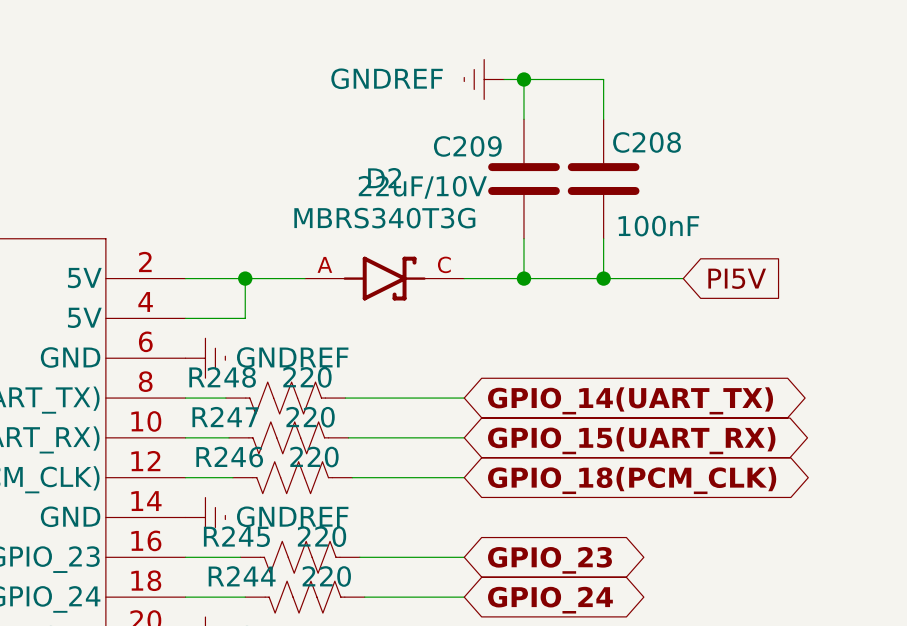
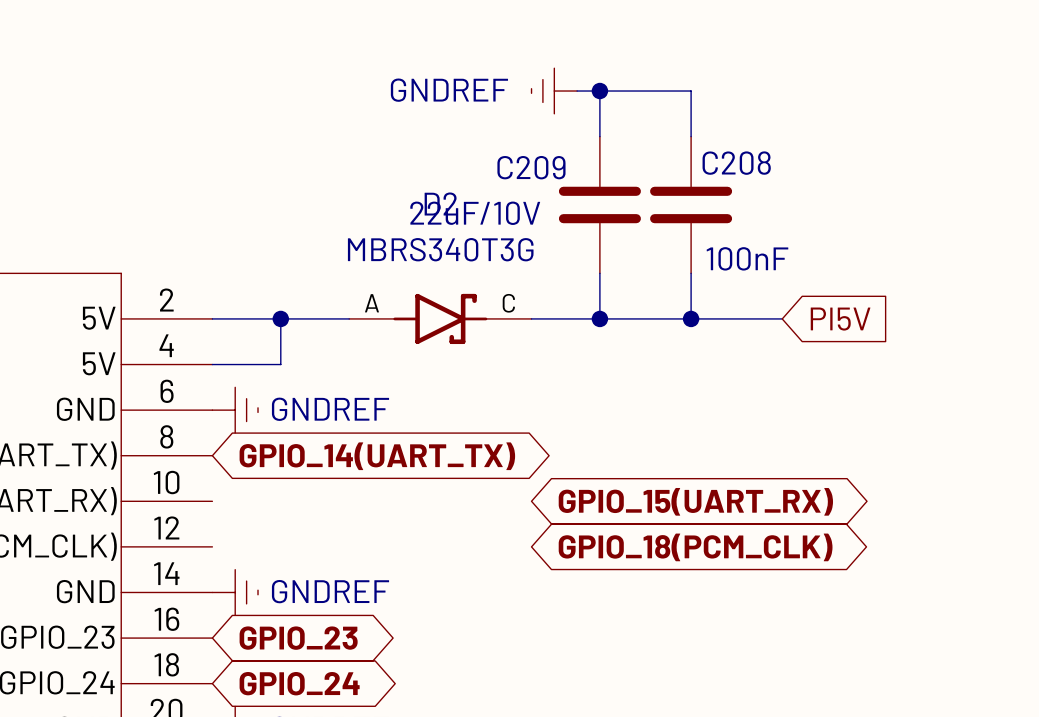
wire: (185, 398) (225, 398) -> none
R248: 220 (285, 398) -> none
wire: (345, 398) (464, 398) -> none
global label position: GPIO_14(UART_TX) (630, 400) -> GPIO_14(UART_TX) (377, 456)
wire: (185, 437) (229, 437) -> none
R247: 220 (288, 437) -> none
wire: (348, 437) (464, 437) -> none
wire: (185, 477) (232, 477) -> none
R246: 220 (292, 477) -> none
wire: (352, 477) (464, 477) -> none
wire: (185, 557) (240, 557) -> none
R245: 220 (300, 557) -> none
wire: (359, 557) (464, 557) -> none
global label position: GPIO_23 (549, 560) -> GPIO_23 (298, 638)
wire: (185, 597) (245, 597) -> none
R244: 220 (304, 597) -> none
wire: (364, 597) (464, 597) -> none
global label position: GPIO_24 (550, 600) -> GPIO_24 (299, 683)

